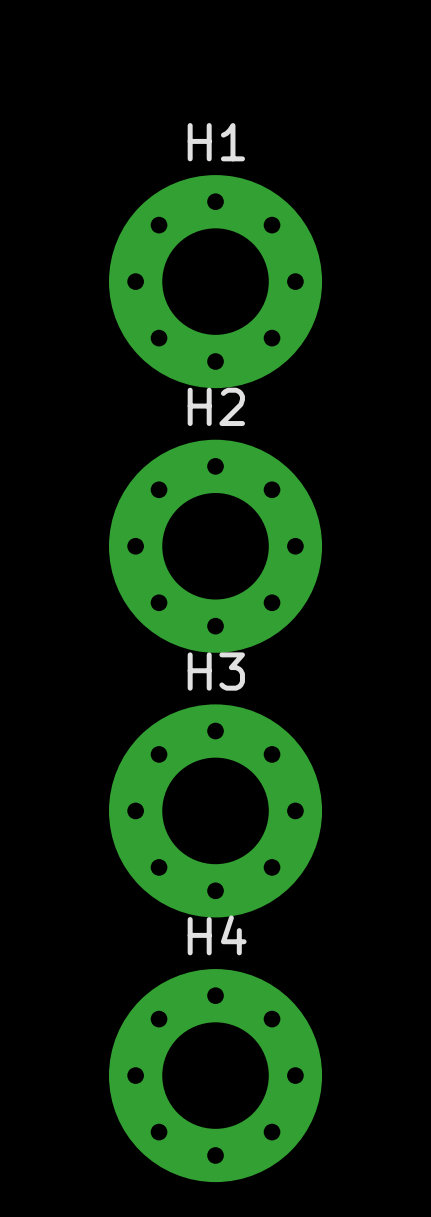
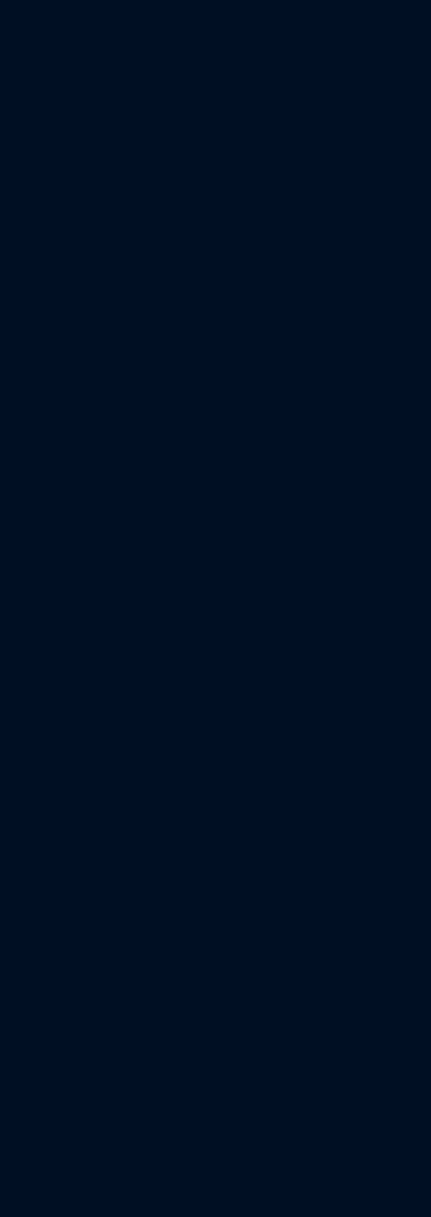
H1: (215, 281) -> none
H2: (215, 546) -> none
H3: (215, 810) -> none
H4: (215, 1075) -> none

